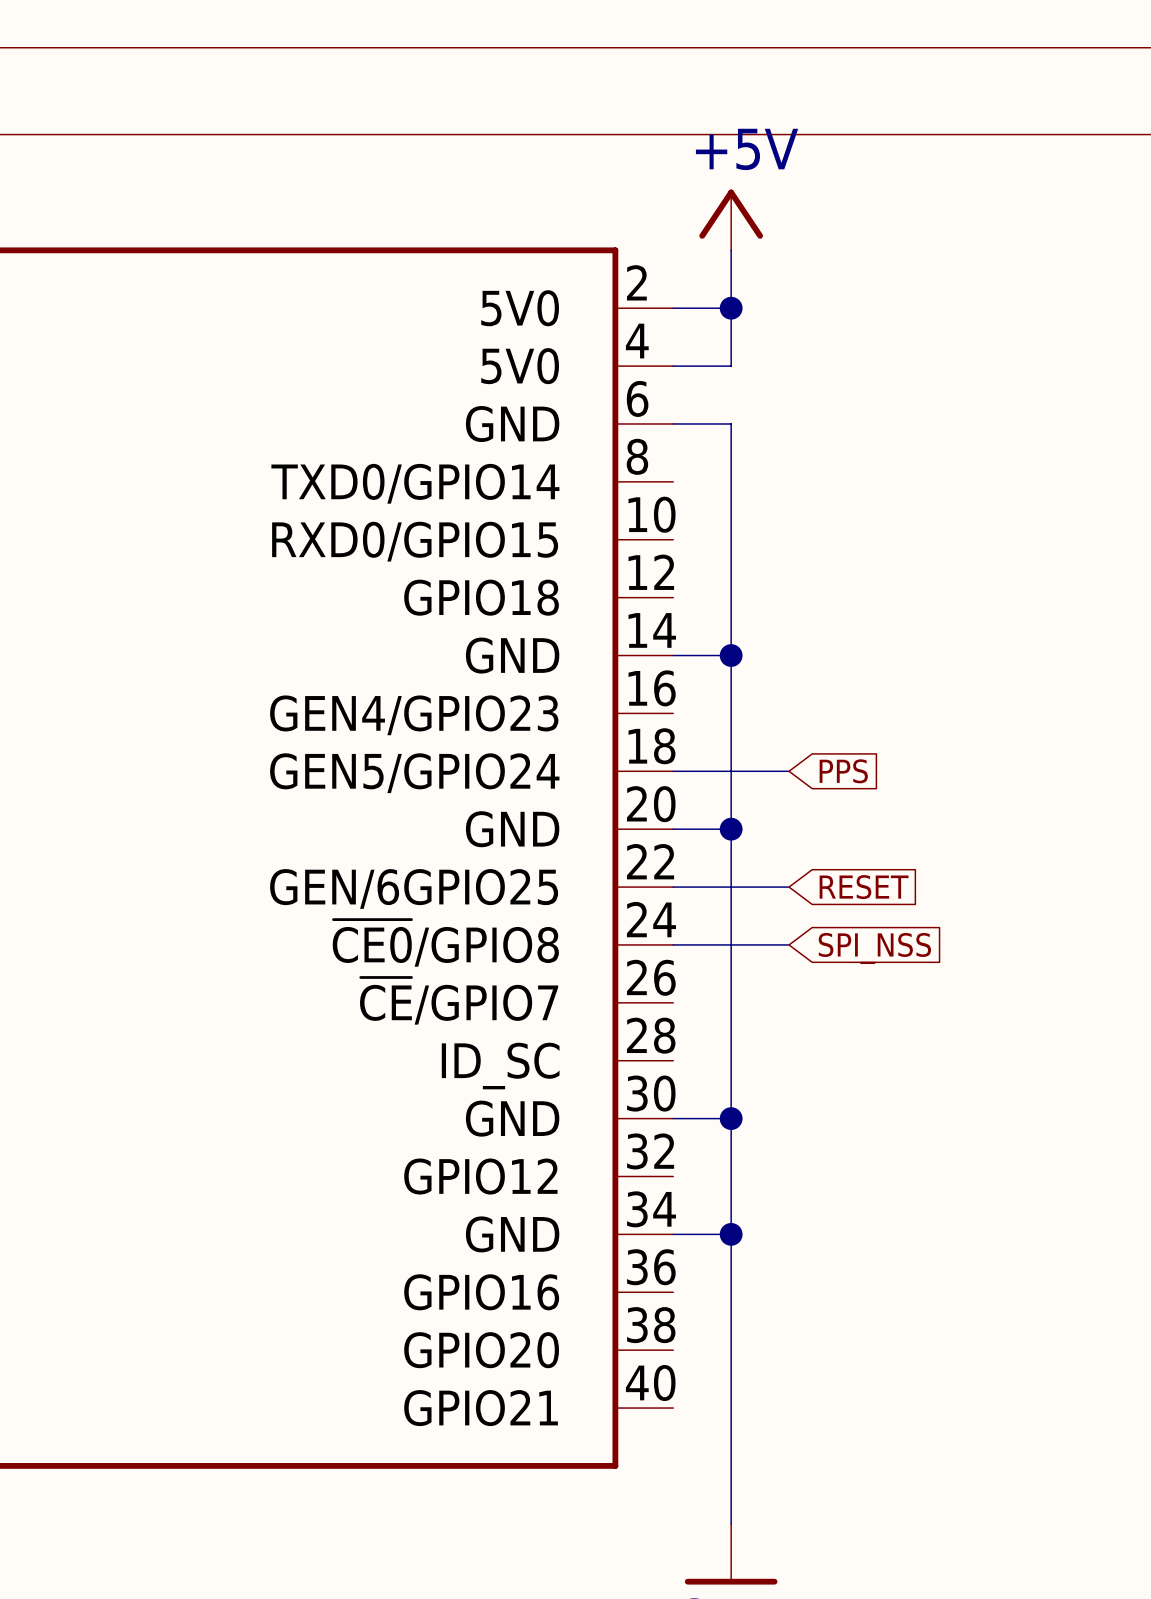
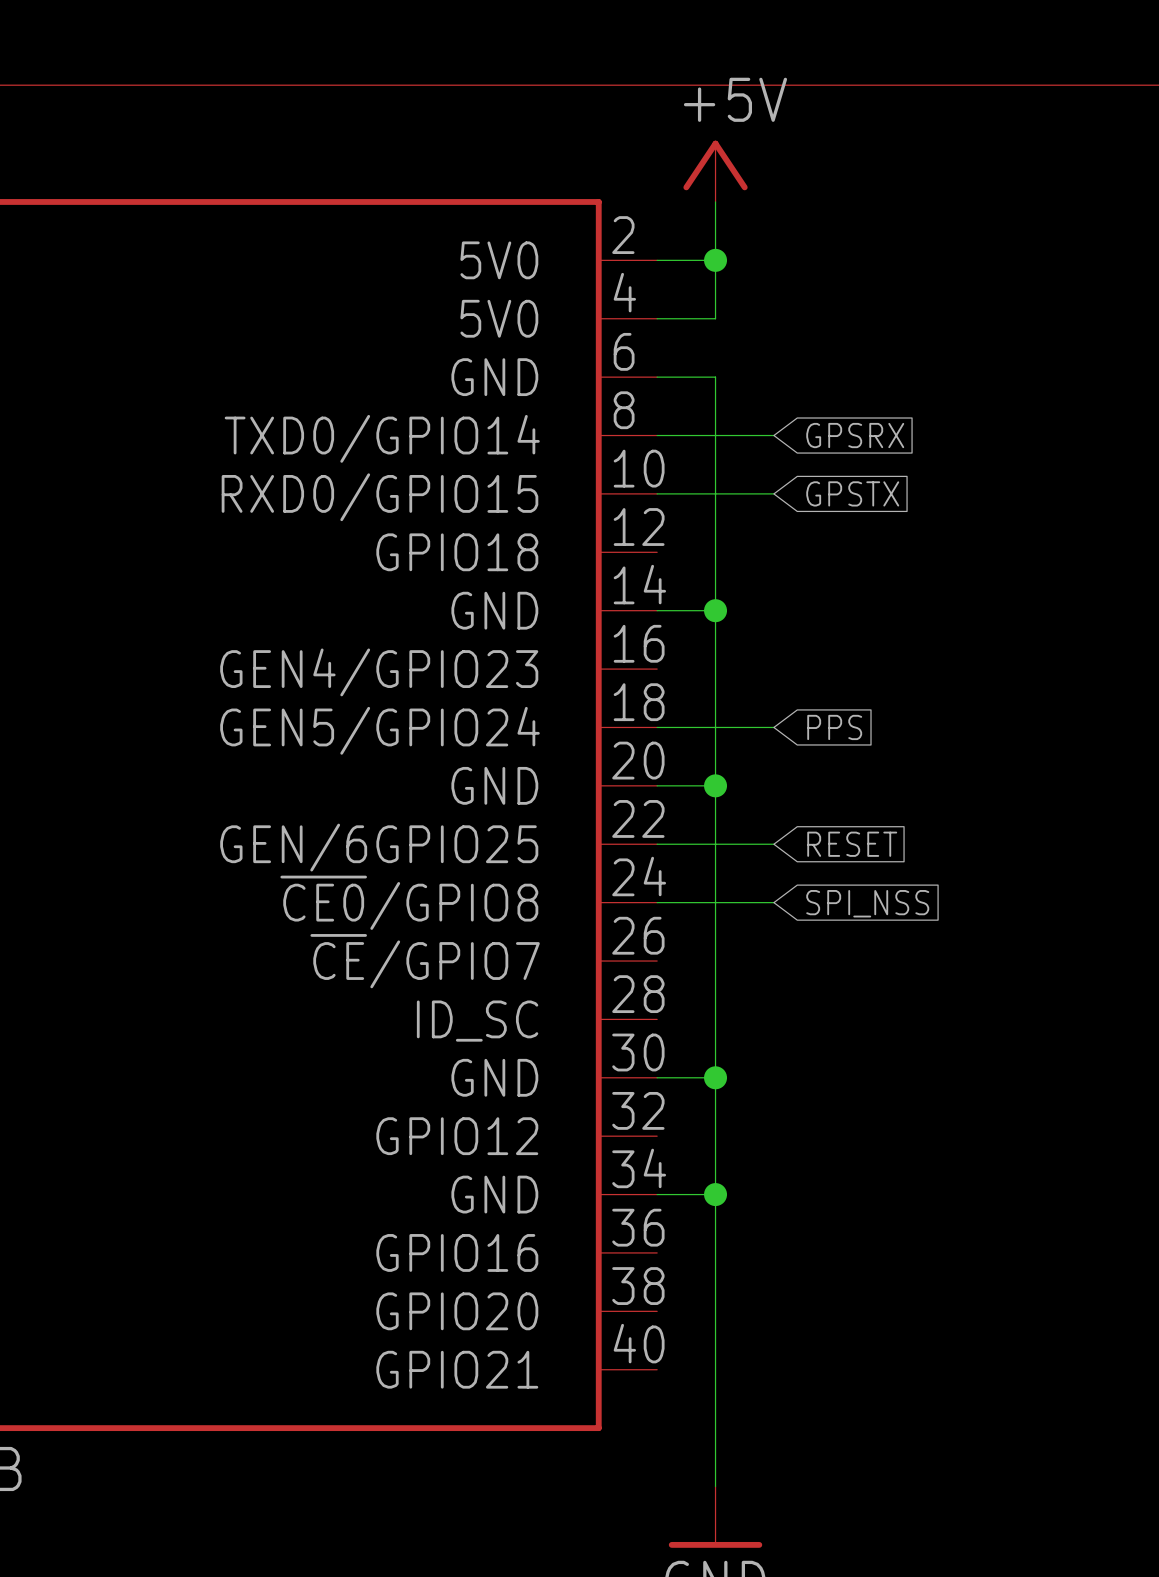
wire: none -> (657, 435) (773, 435)
global label: none -> GPSRX (855, 435)
wire: none -> (657, 493) (773, 493)
global label: none -> GPSTX (852, 493)

